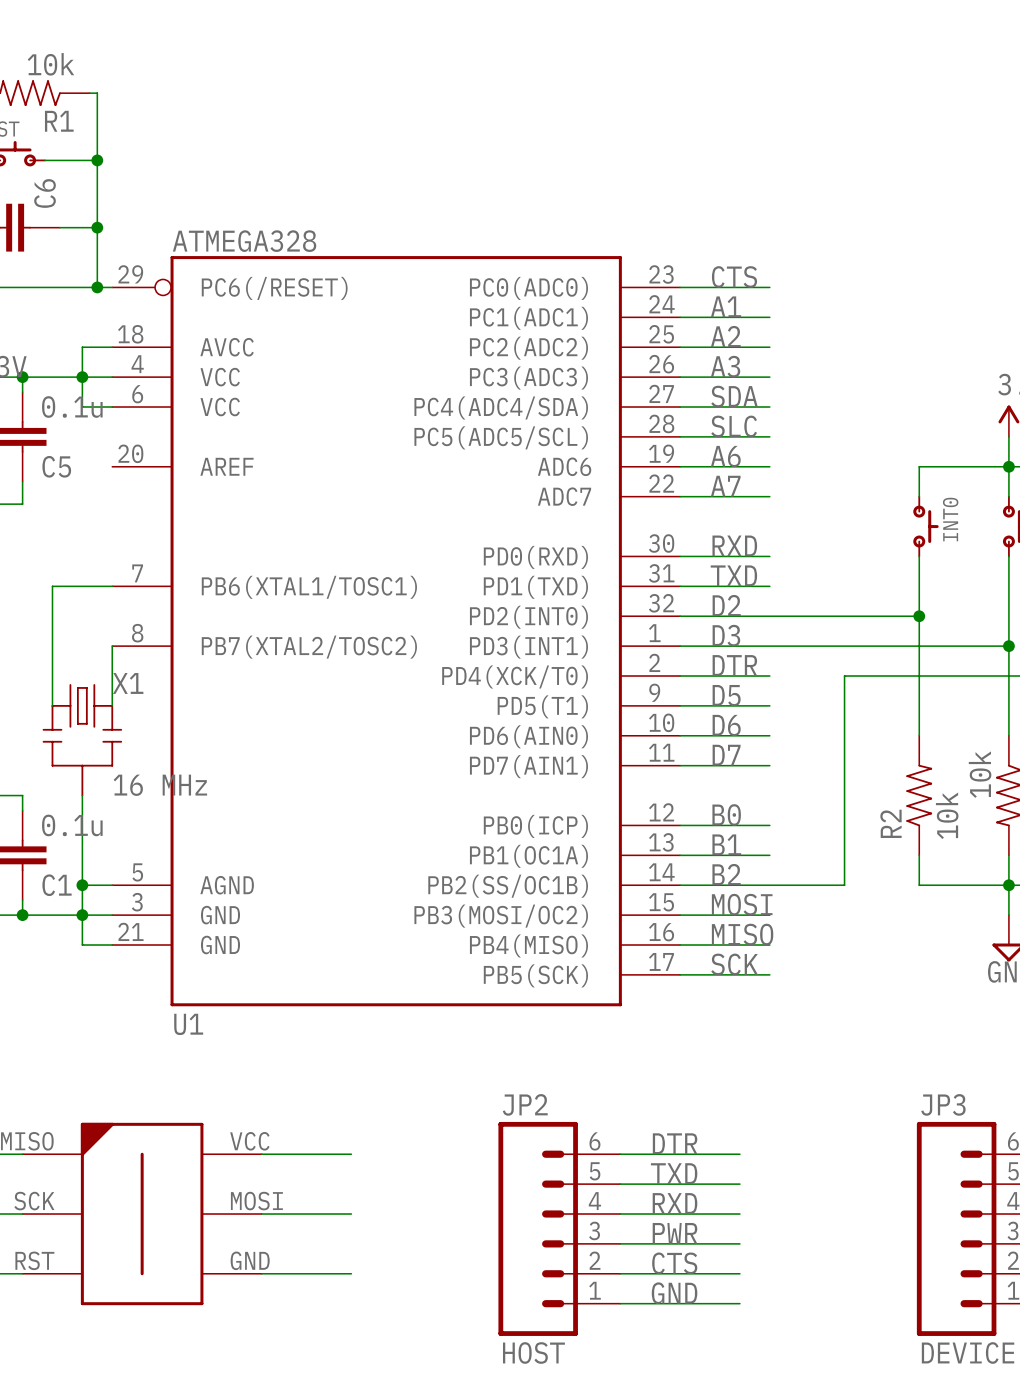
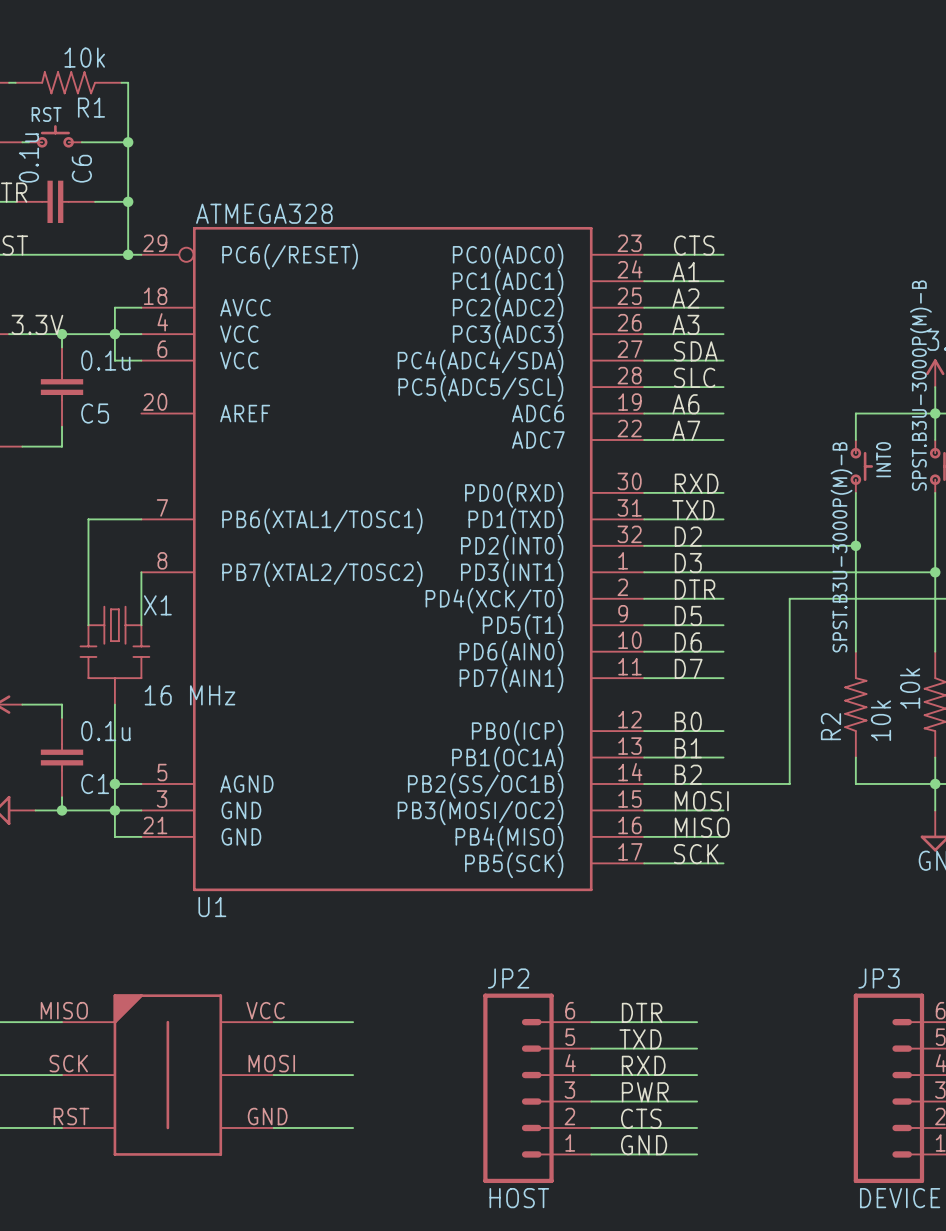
part value: none -> SPST.B3U-3000P(M)-B (920, 385)
INT0 value: none -> SPST.B3U-3000P(M)-B (841, 547)

